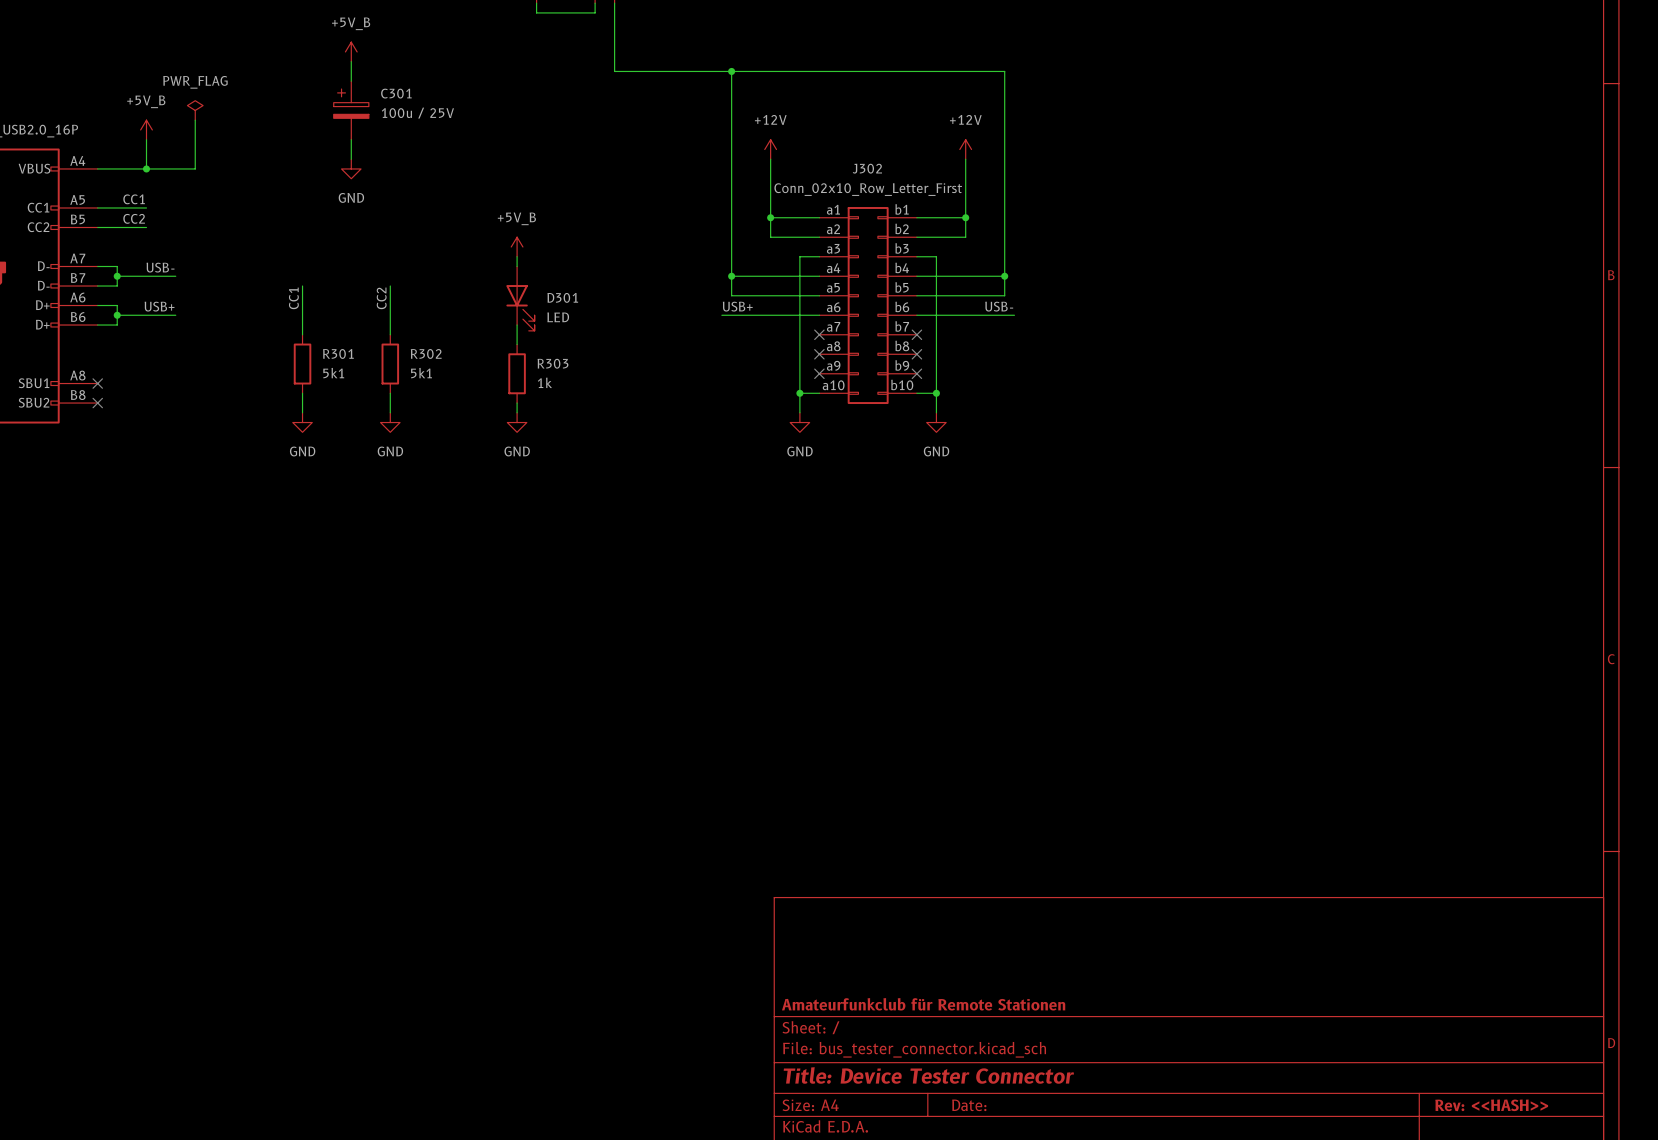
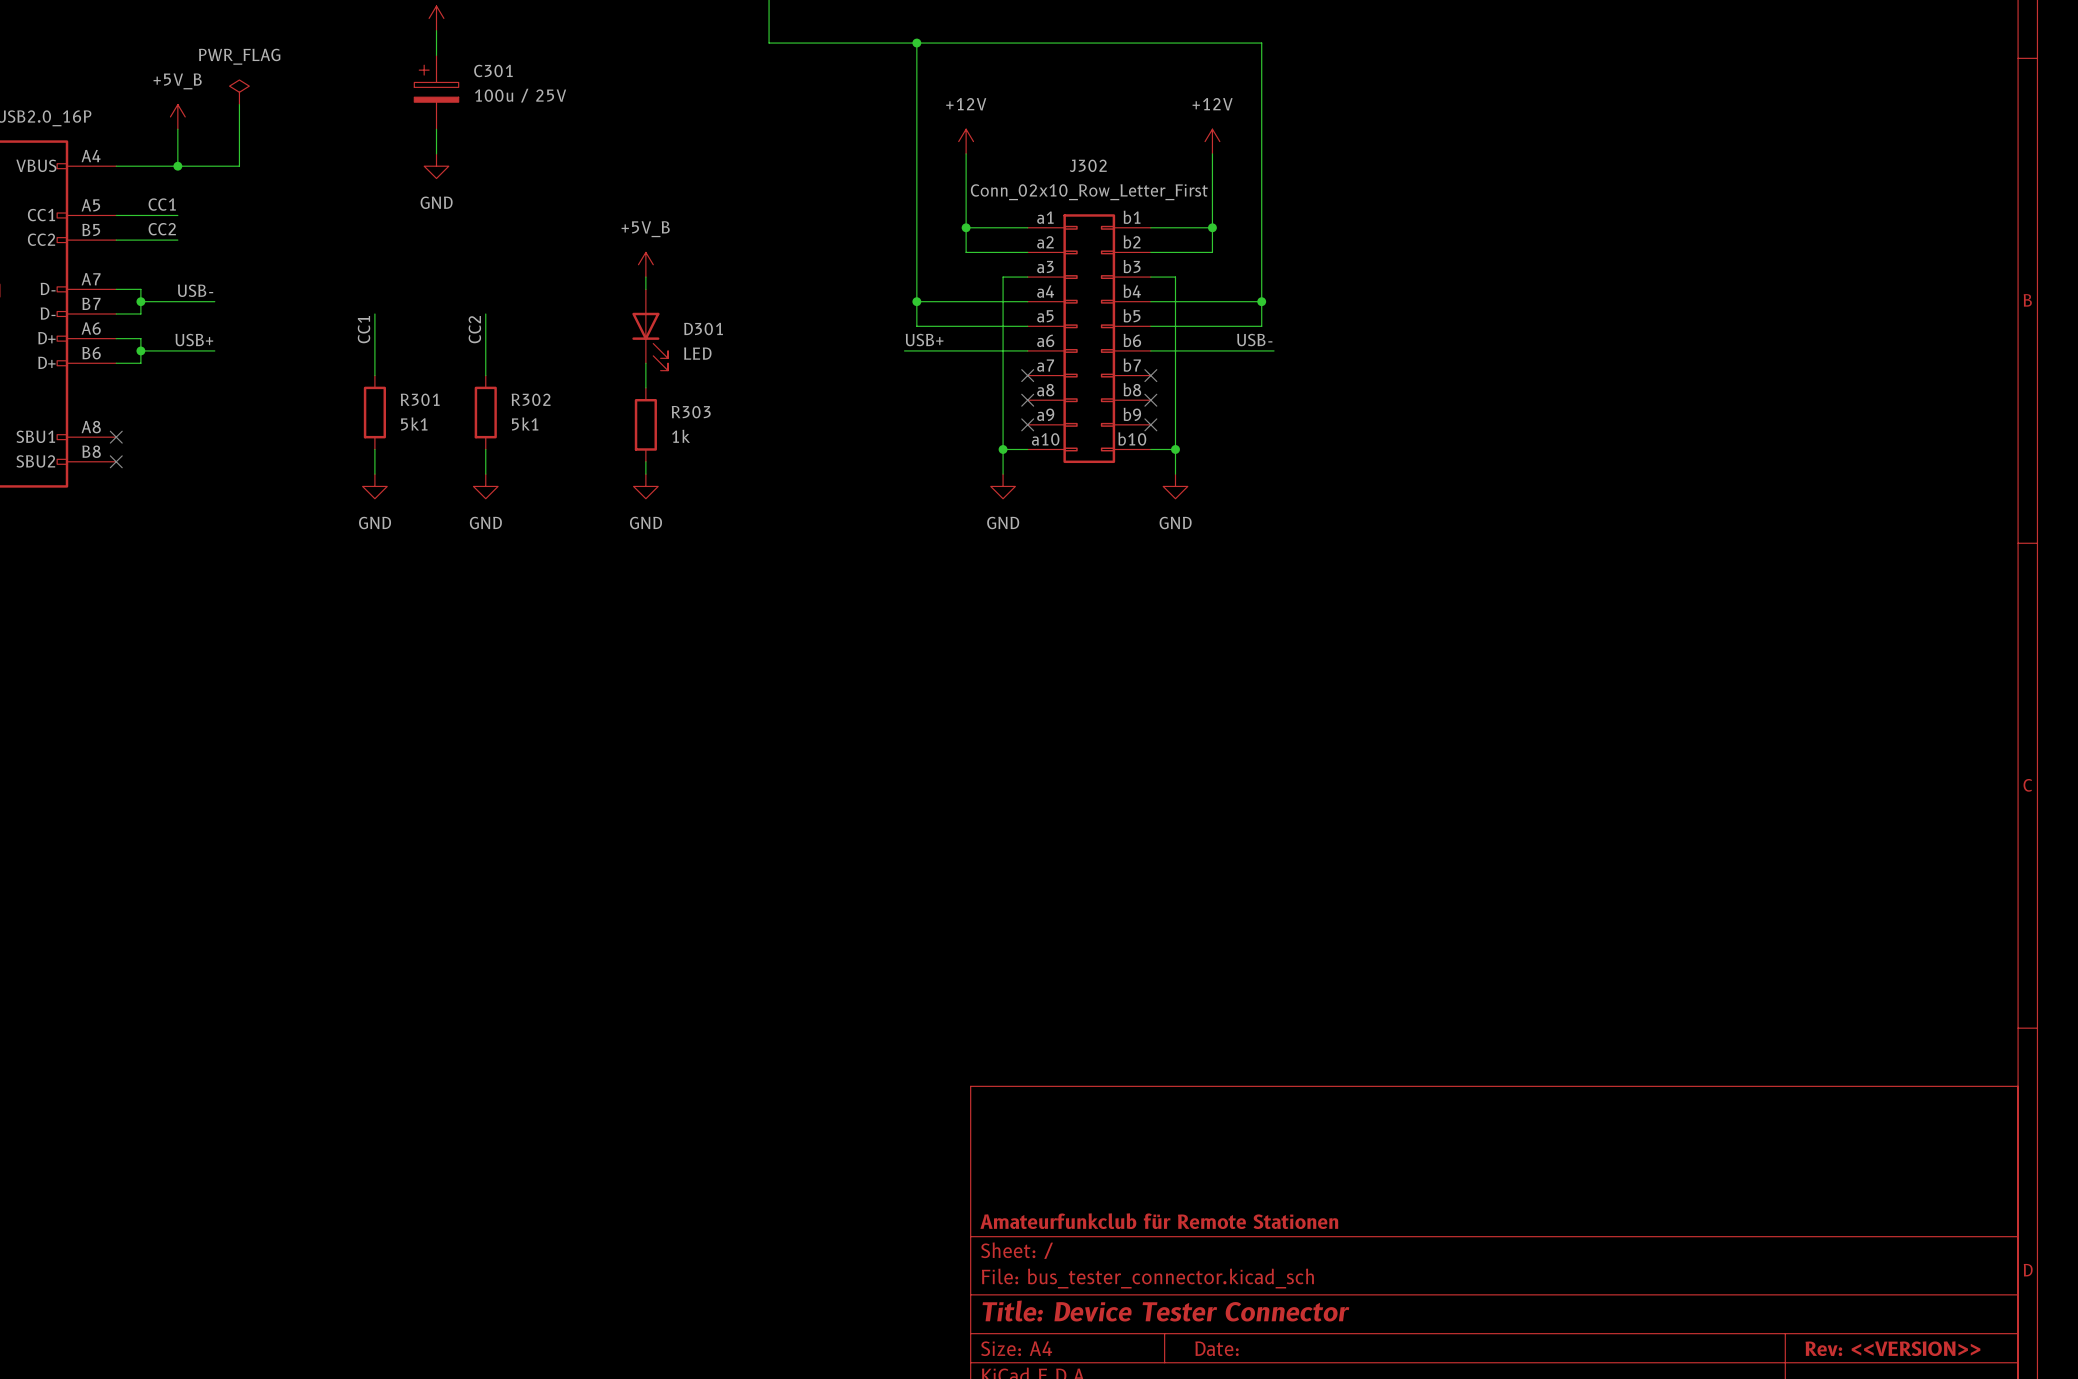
title block: Rev: <<HASH>> (1491, 1105) -> Rev: <<VERSION>> (1892, 1348)

